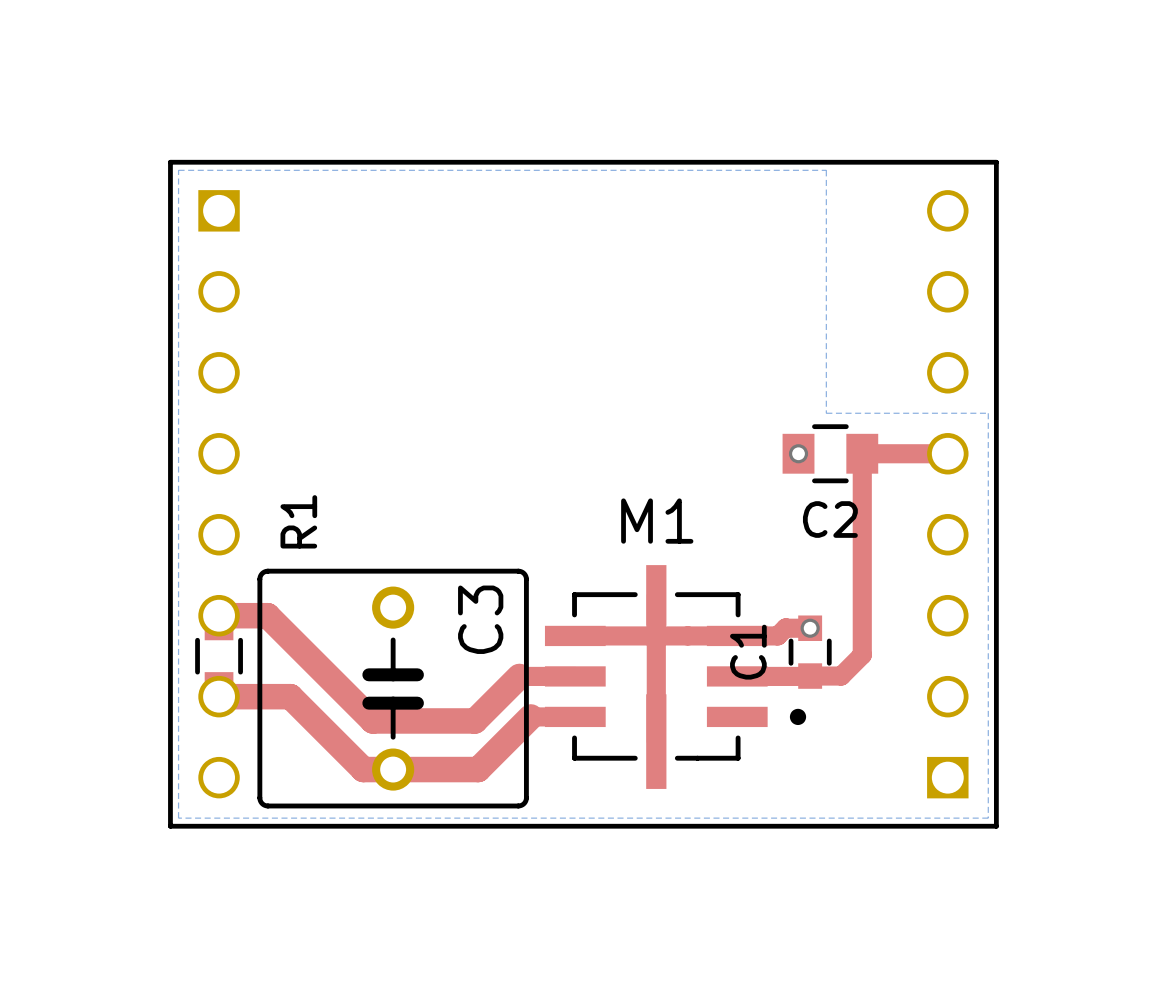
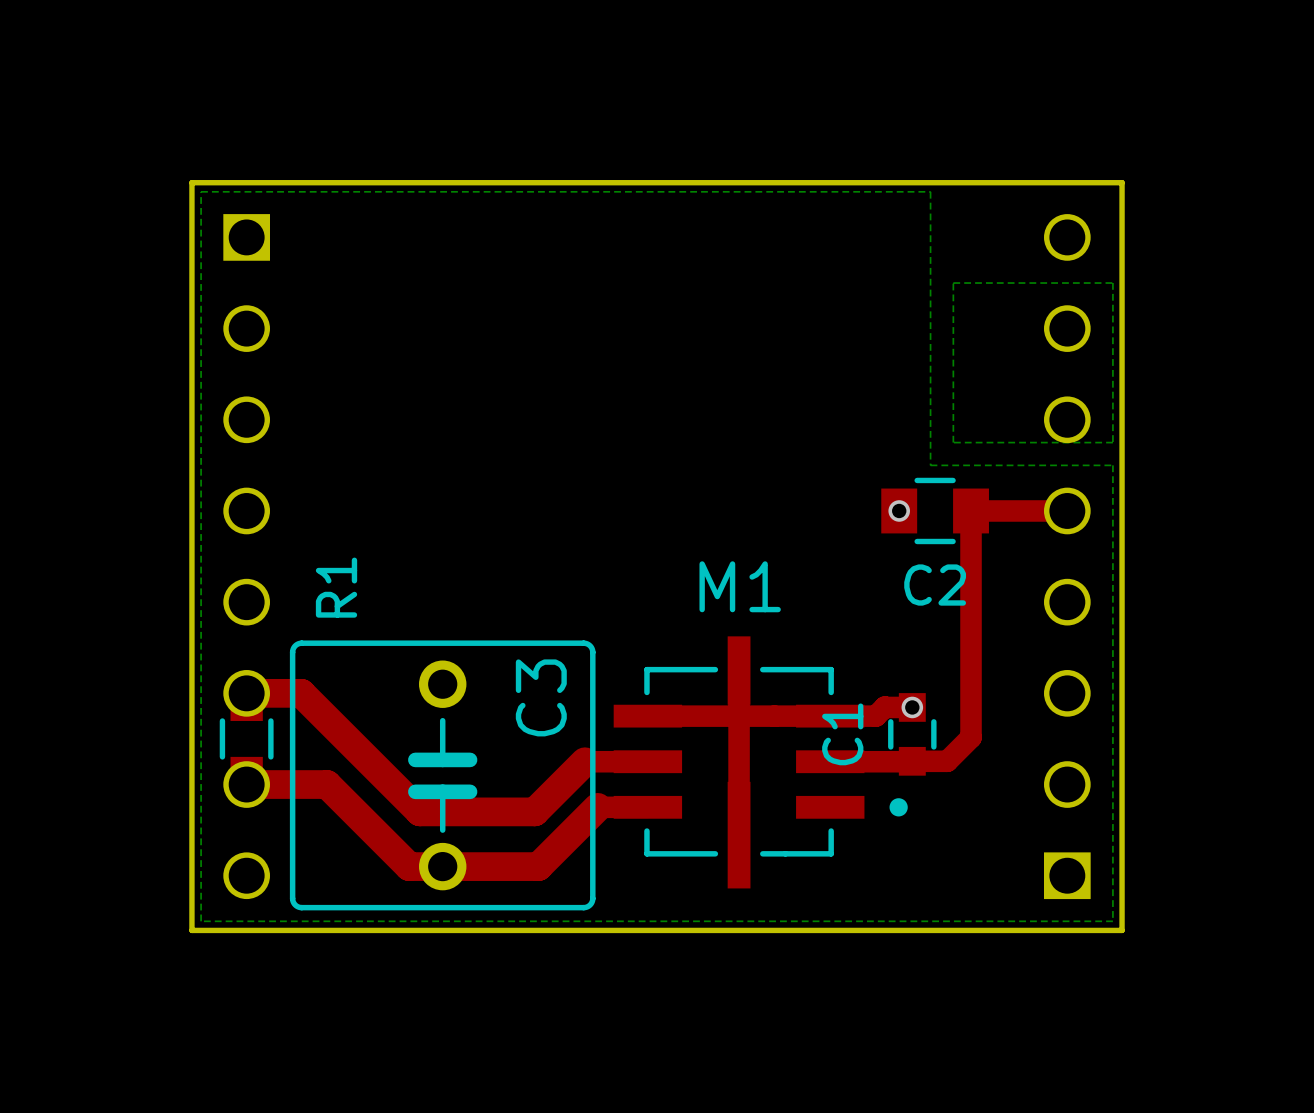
bottom zone outline: none -> (953, 283) (953, 442) (1112, 442) (1112, 283) (953, 283)

